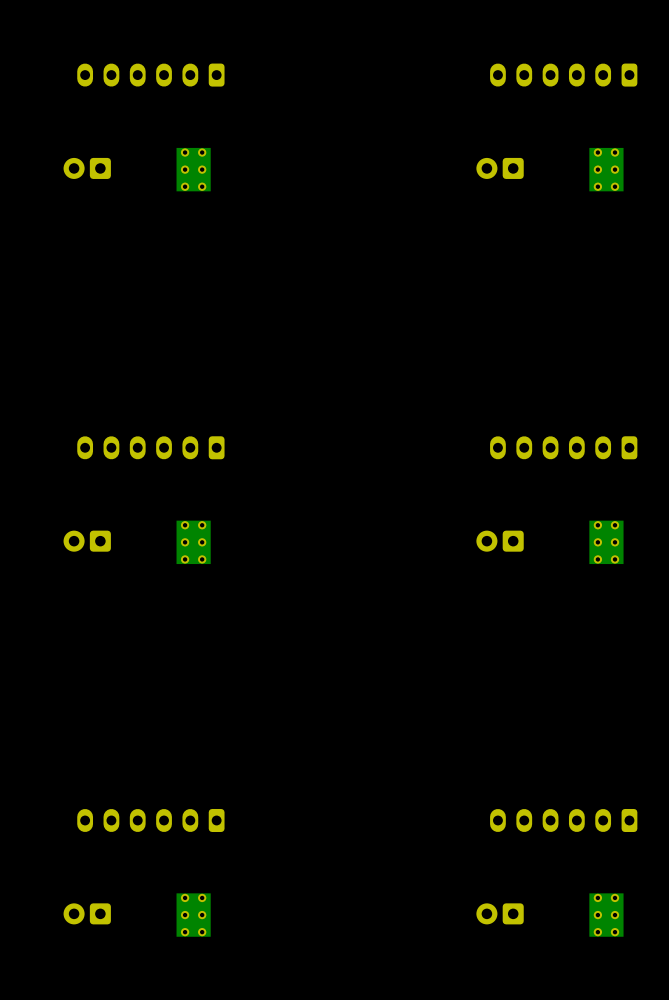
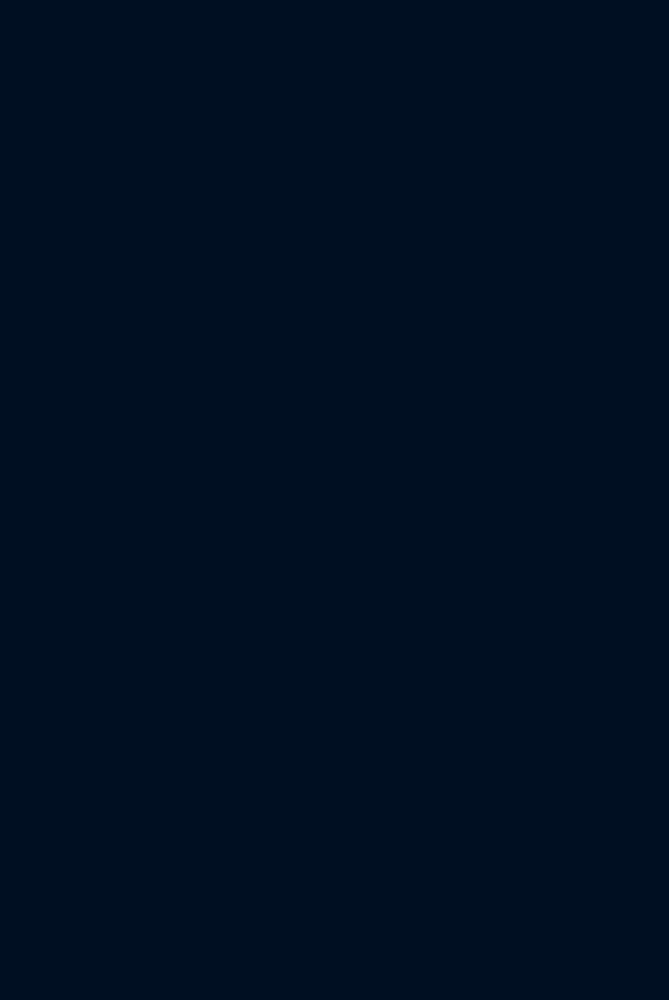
part: (150, 75) -> none
part: (563, 75) -> none
part: (87, 168) -> none
part: (500, 168) -> none
part: (193, 169) -> none
part: (606, 169) -> none
part: (150, 447) -> none
part: (563, 447) -> none
part: (87, 541) -> none
part: (500, 541) -> none
part: (193, 542) -> none
part: (606, 542) -> none
part: (150, 820) -> none
part: (563, 820) -> none
part: (87, 913) -> none
part: (500, 913) -> none
part: (193, 915) -> none
part: (606, 915) -> none

